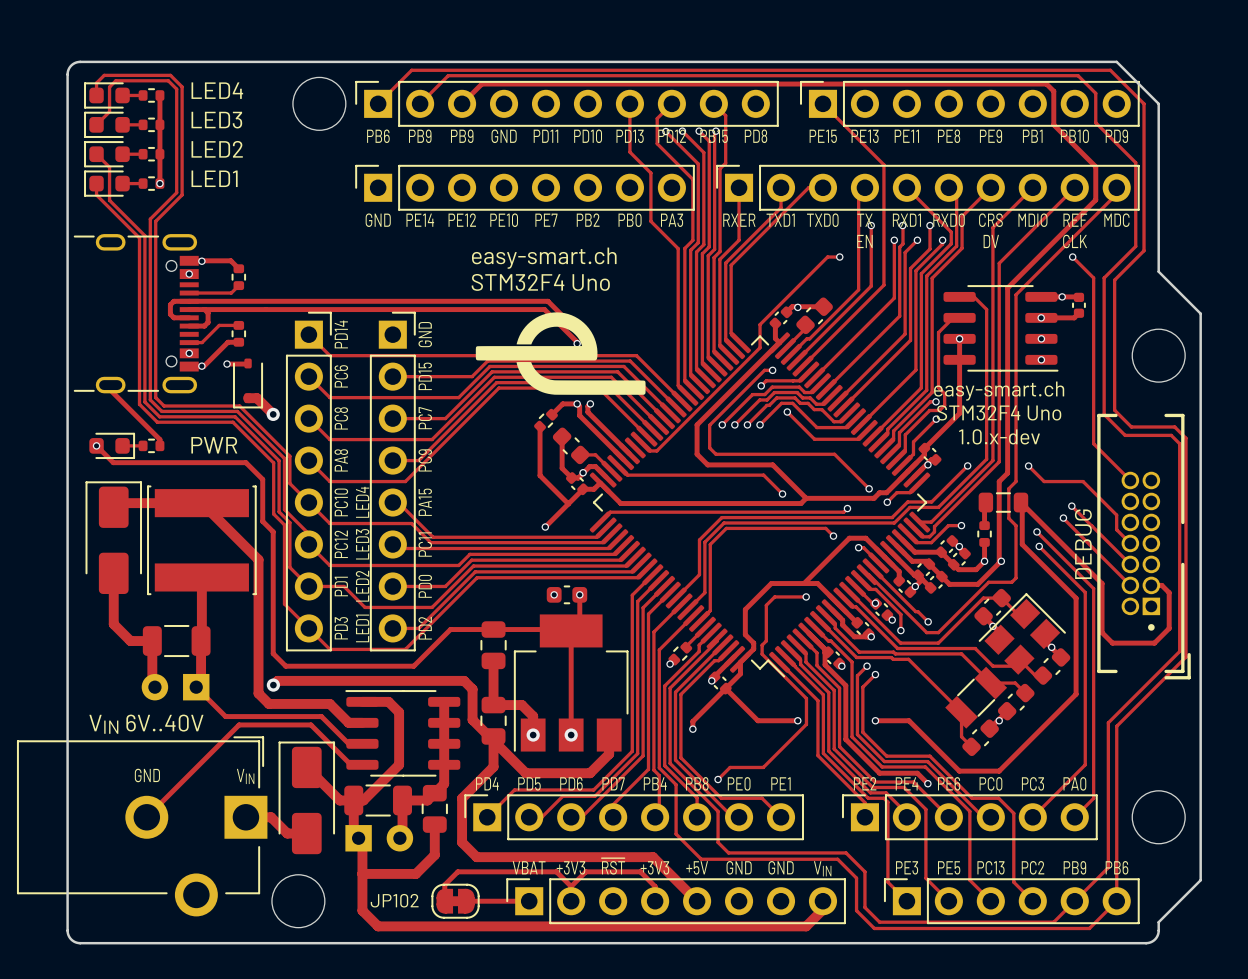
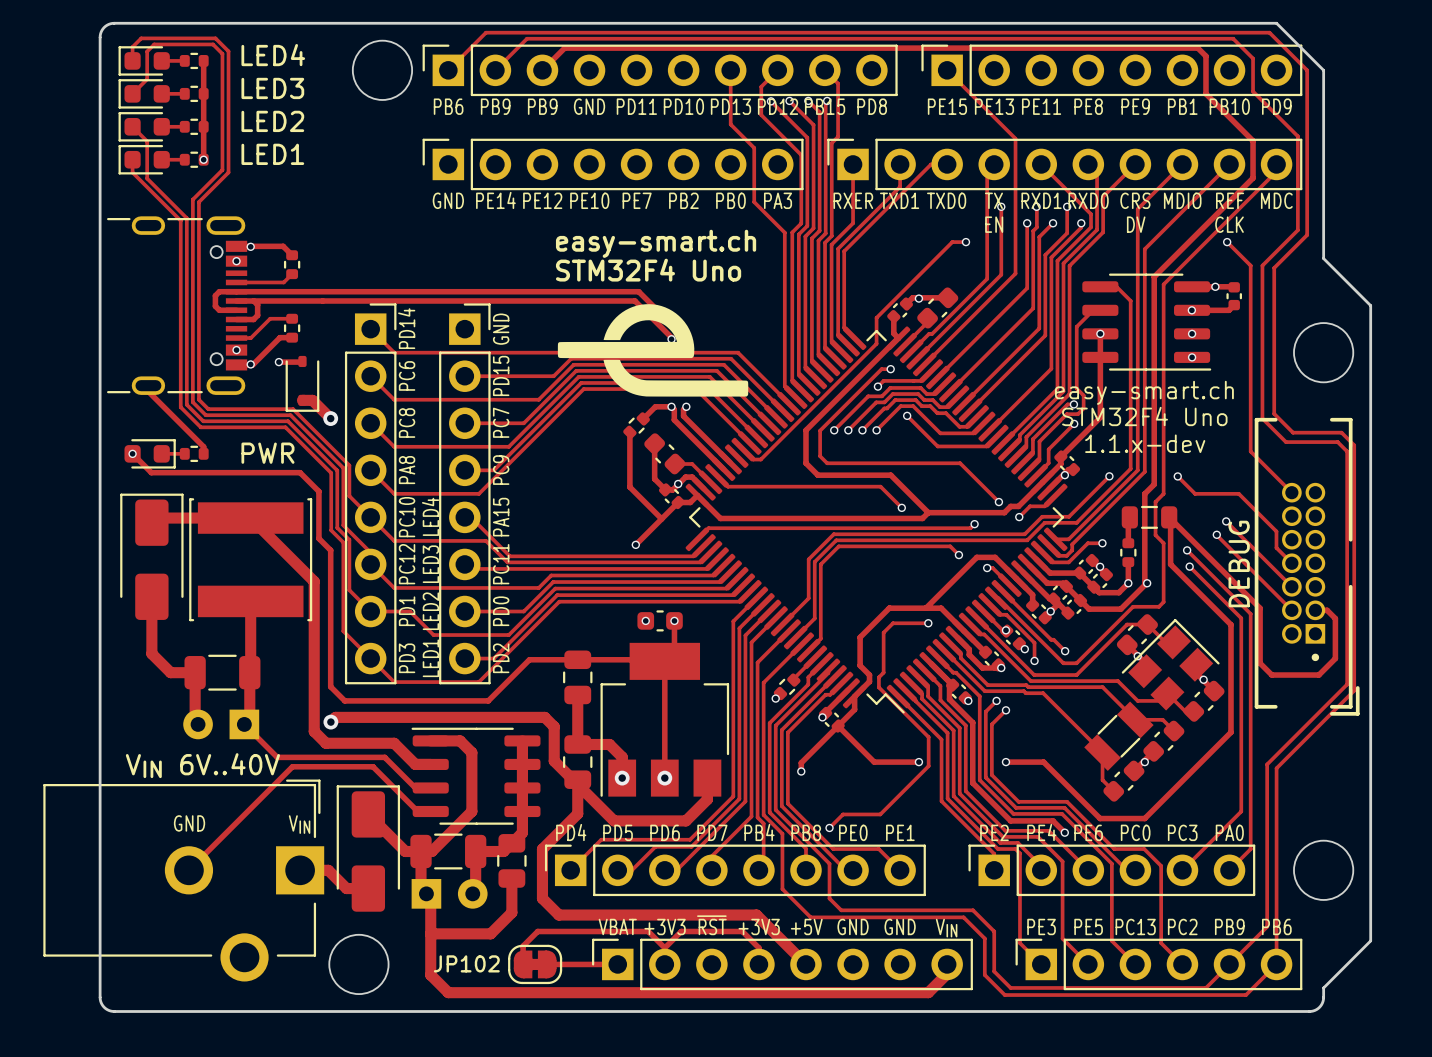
text: 1.0.x-dev (999, 436) -> 1.1.x-dev (1145, 443)

